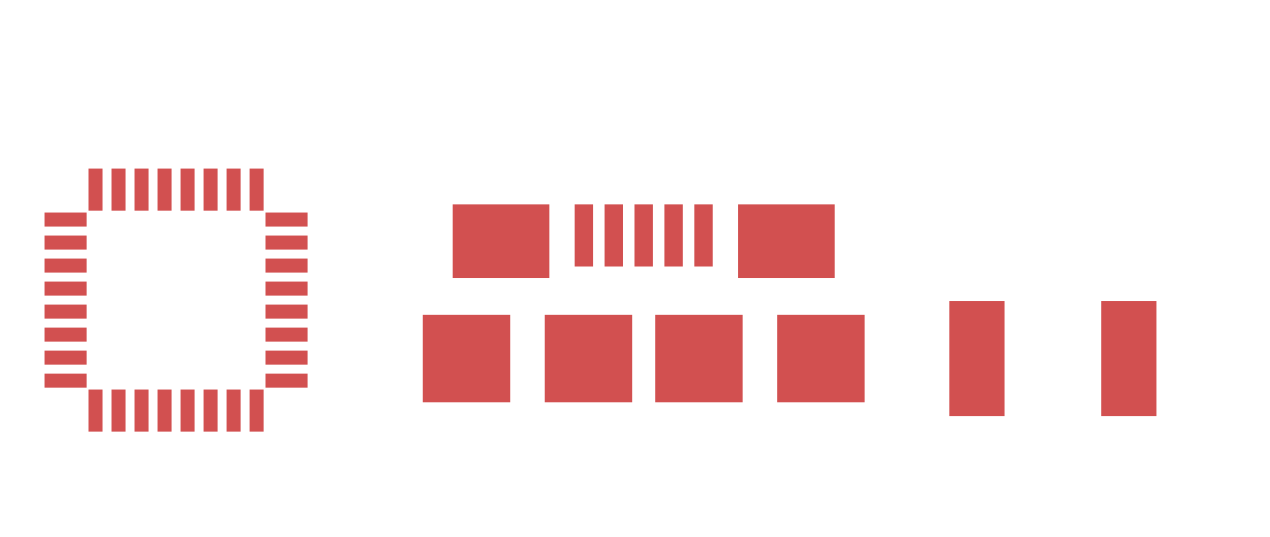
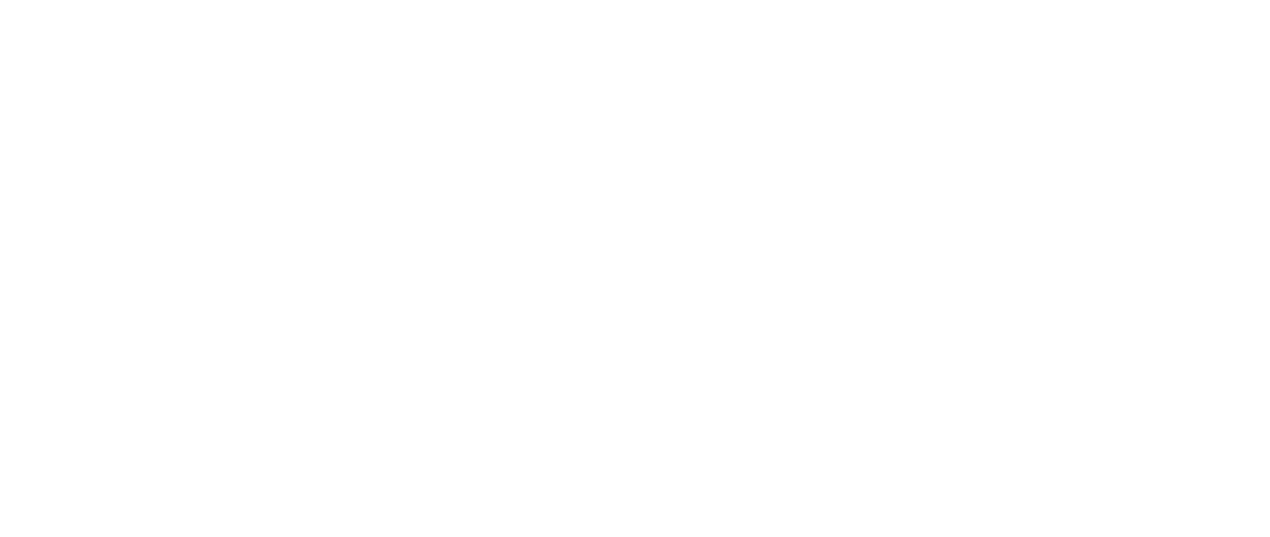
part: (176, 300) -> none
part: (643, 303) -> none
part: (1052, 358) -> none

